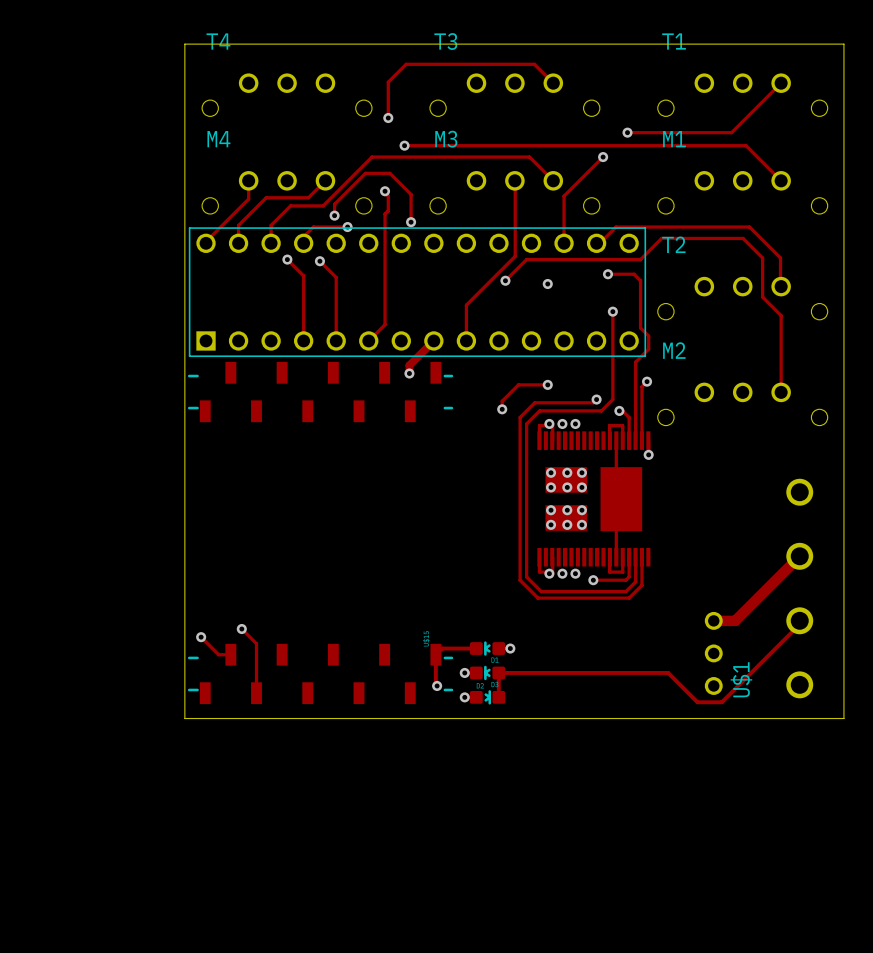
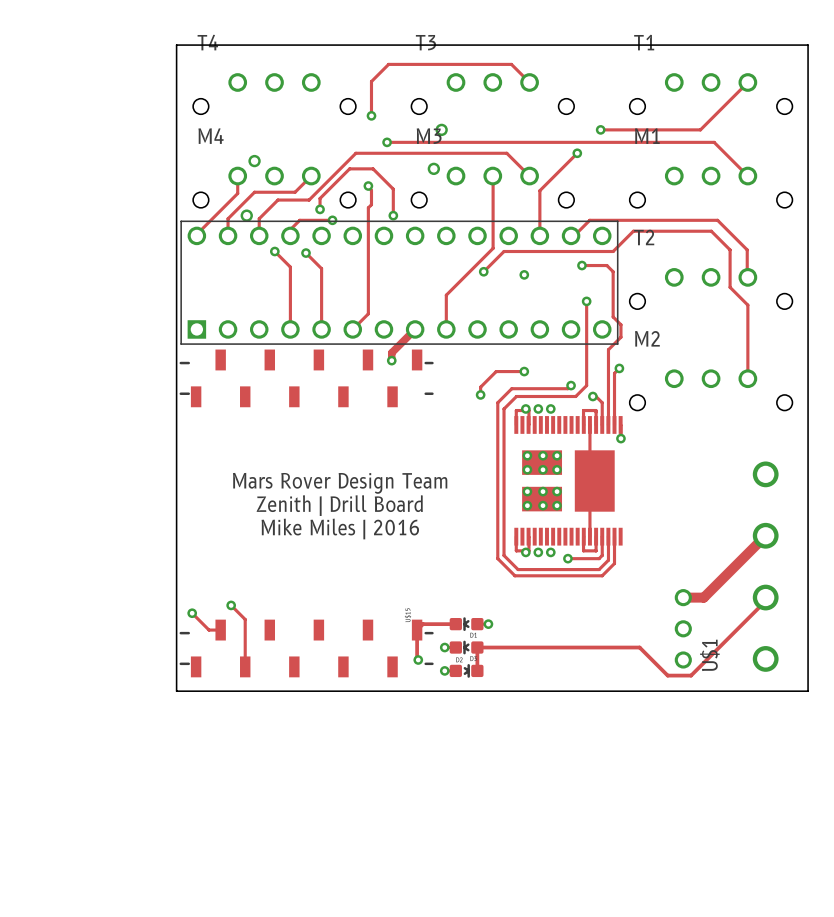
via: none -> (441, 129)
via: none -> (254, 161)
via: none -> (433, 168)
via: none -> (246, 215)
text: none -> Mars Rover Design Team (340, 483)
text: none -> Zenith | Drill Board (339, 505)
text: none -> Mike Miles | 2016 (340, 529)

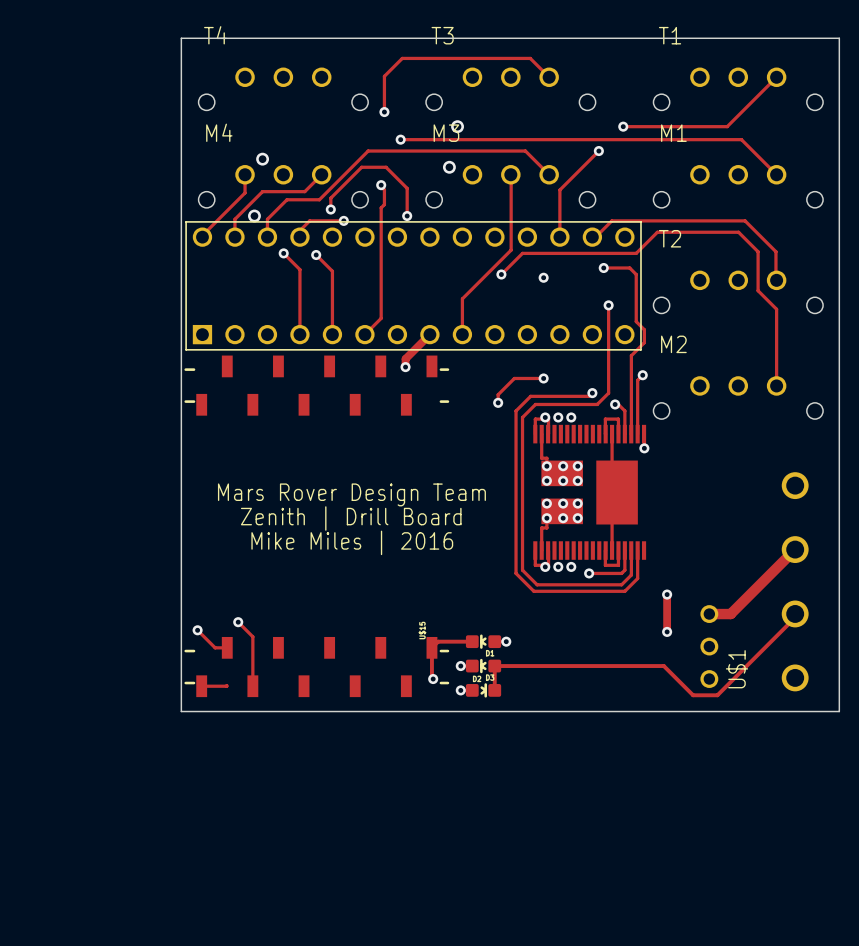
track: none -> (541, 434) (541, 458) (546, 458) (546, 466)
track: none -> (546, 518) (546, 527) (541, 527) (541, 550)
track: none -> (667, 594) (667, 631)
via: none -> (667, 594)
via: none -> (667, 631)
track: none -> (226, 685) (201, 686)

